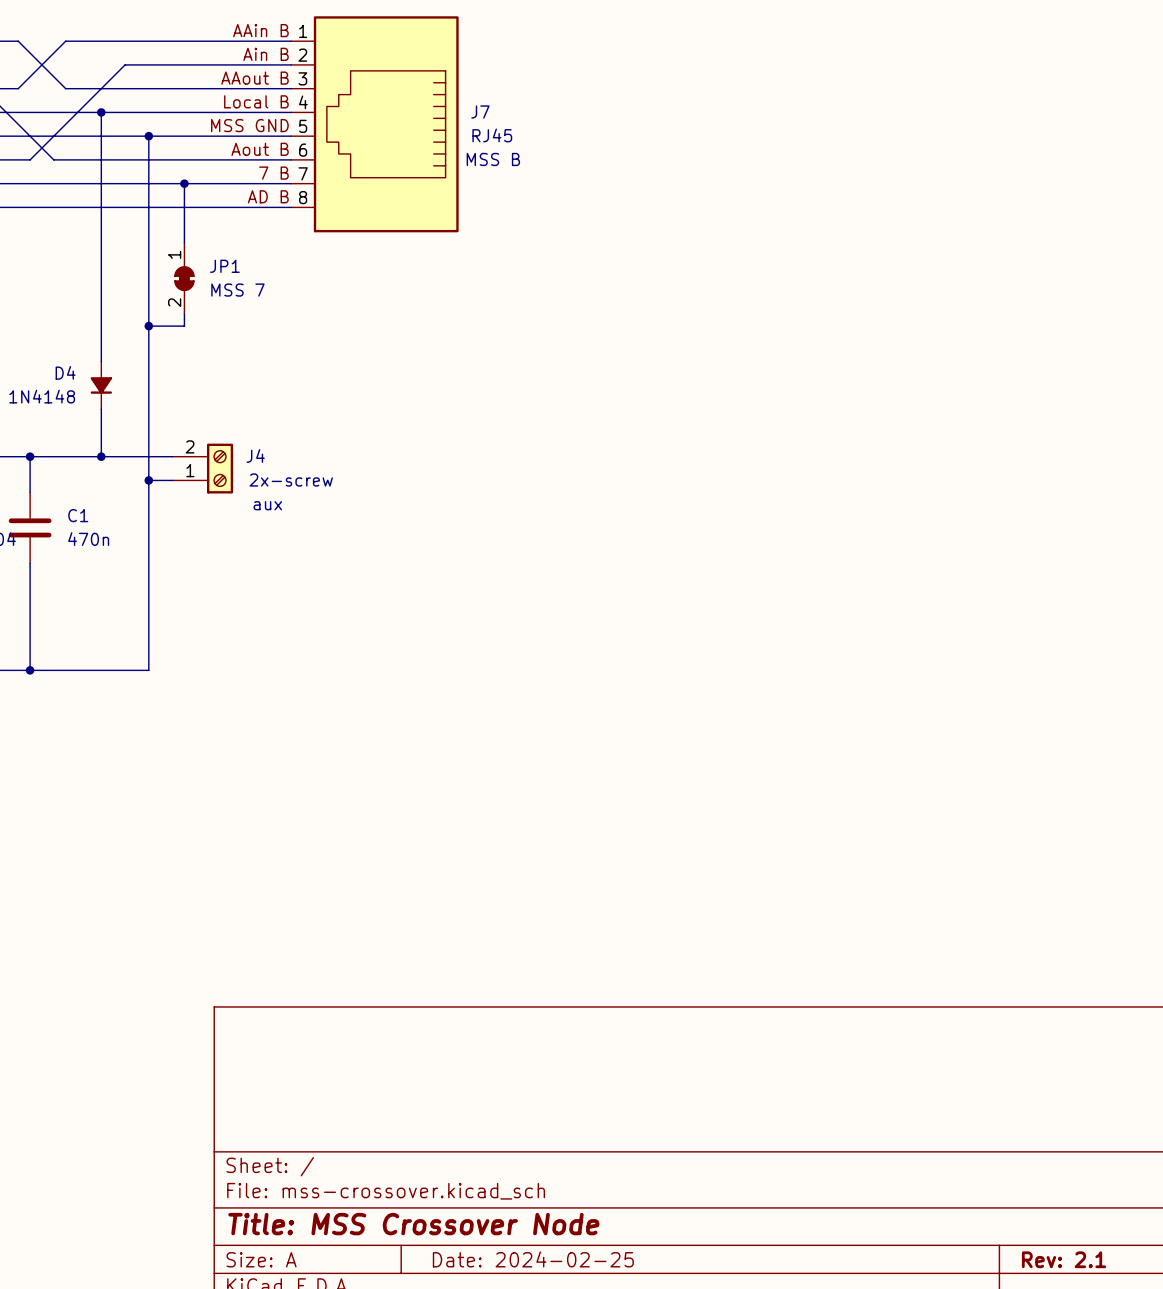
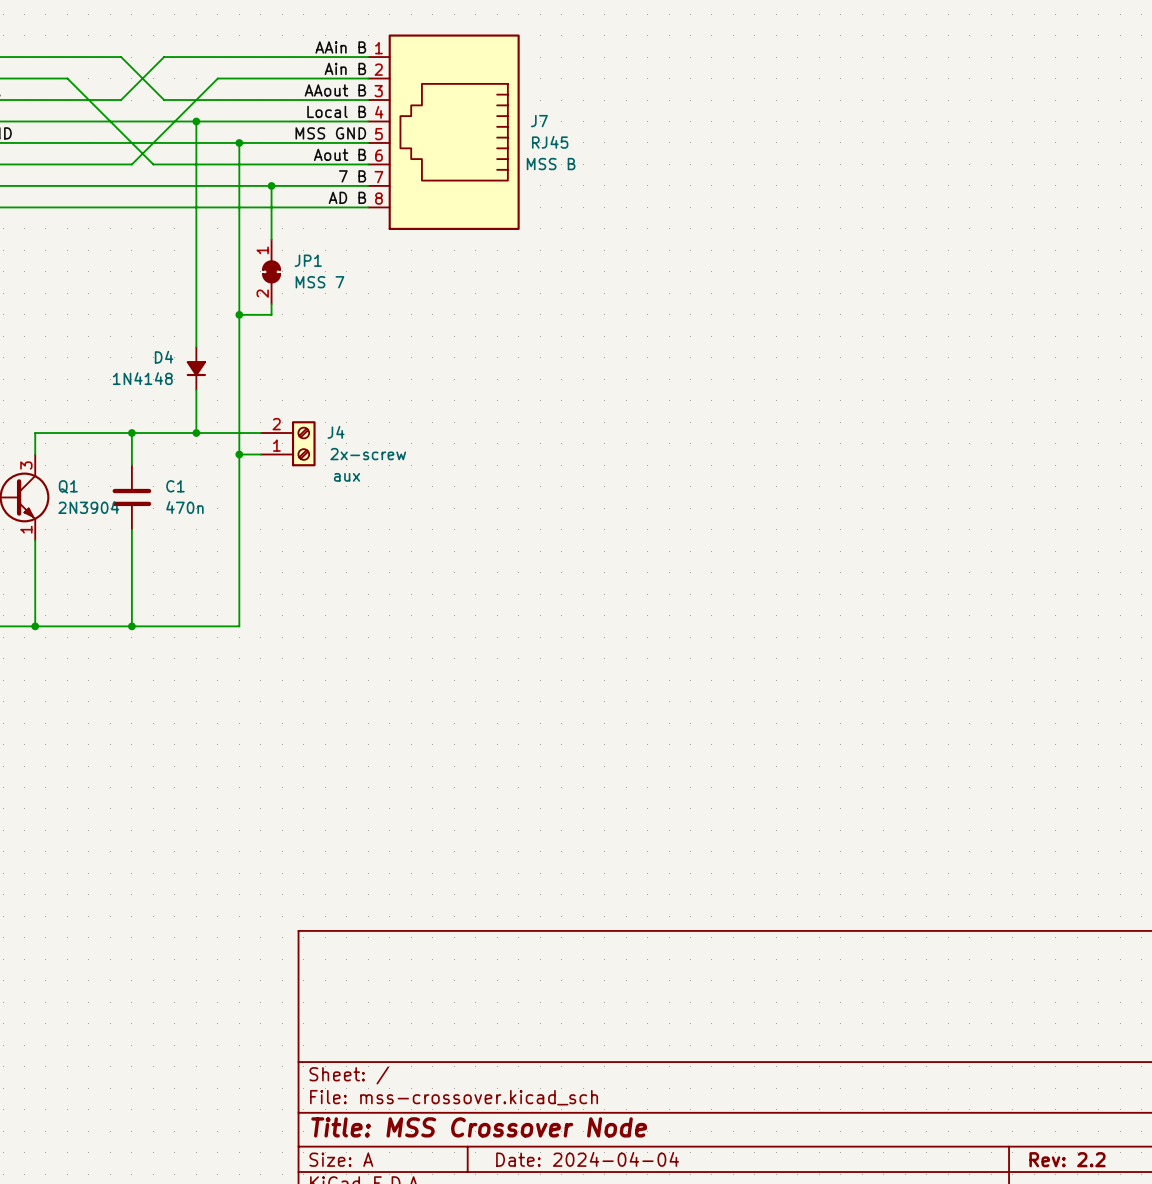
title block: Date: 2024-02-25 (533, 1259) -> Date: 2024-04-04 (587, 1159)
title block: Rev: 2.1 (1064, 1259) -> Rev: 2.2 (1067, 1159)

